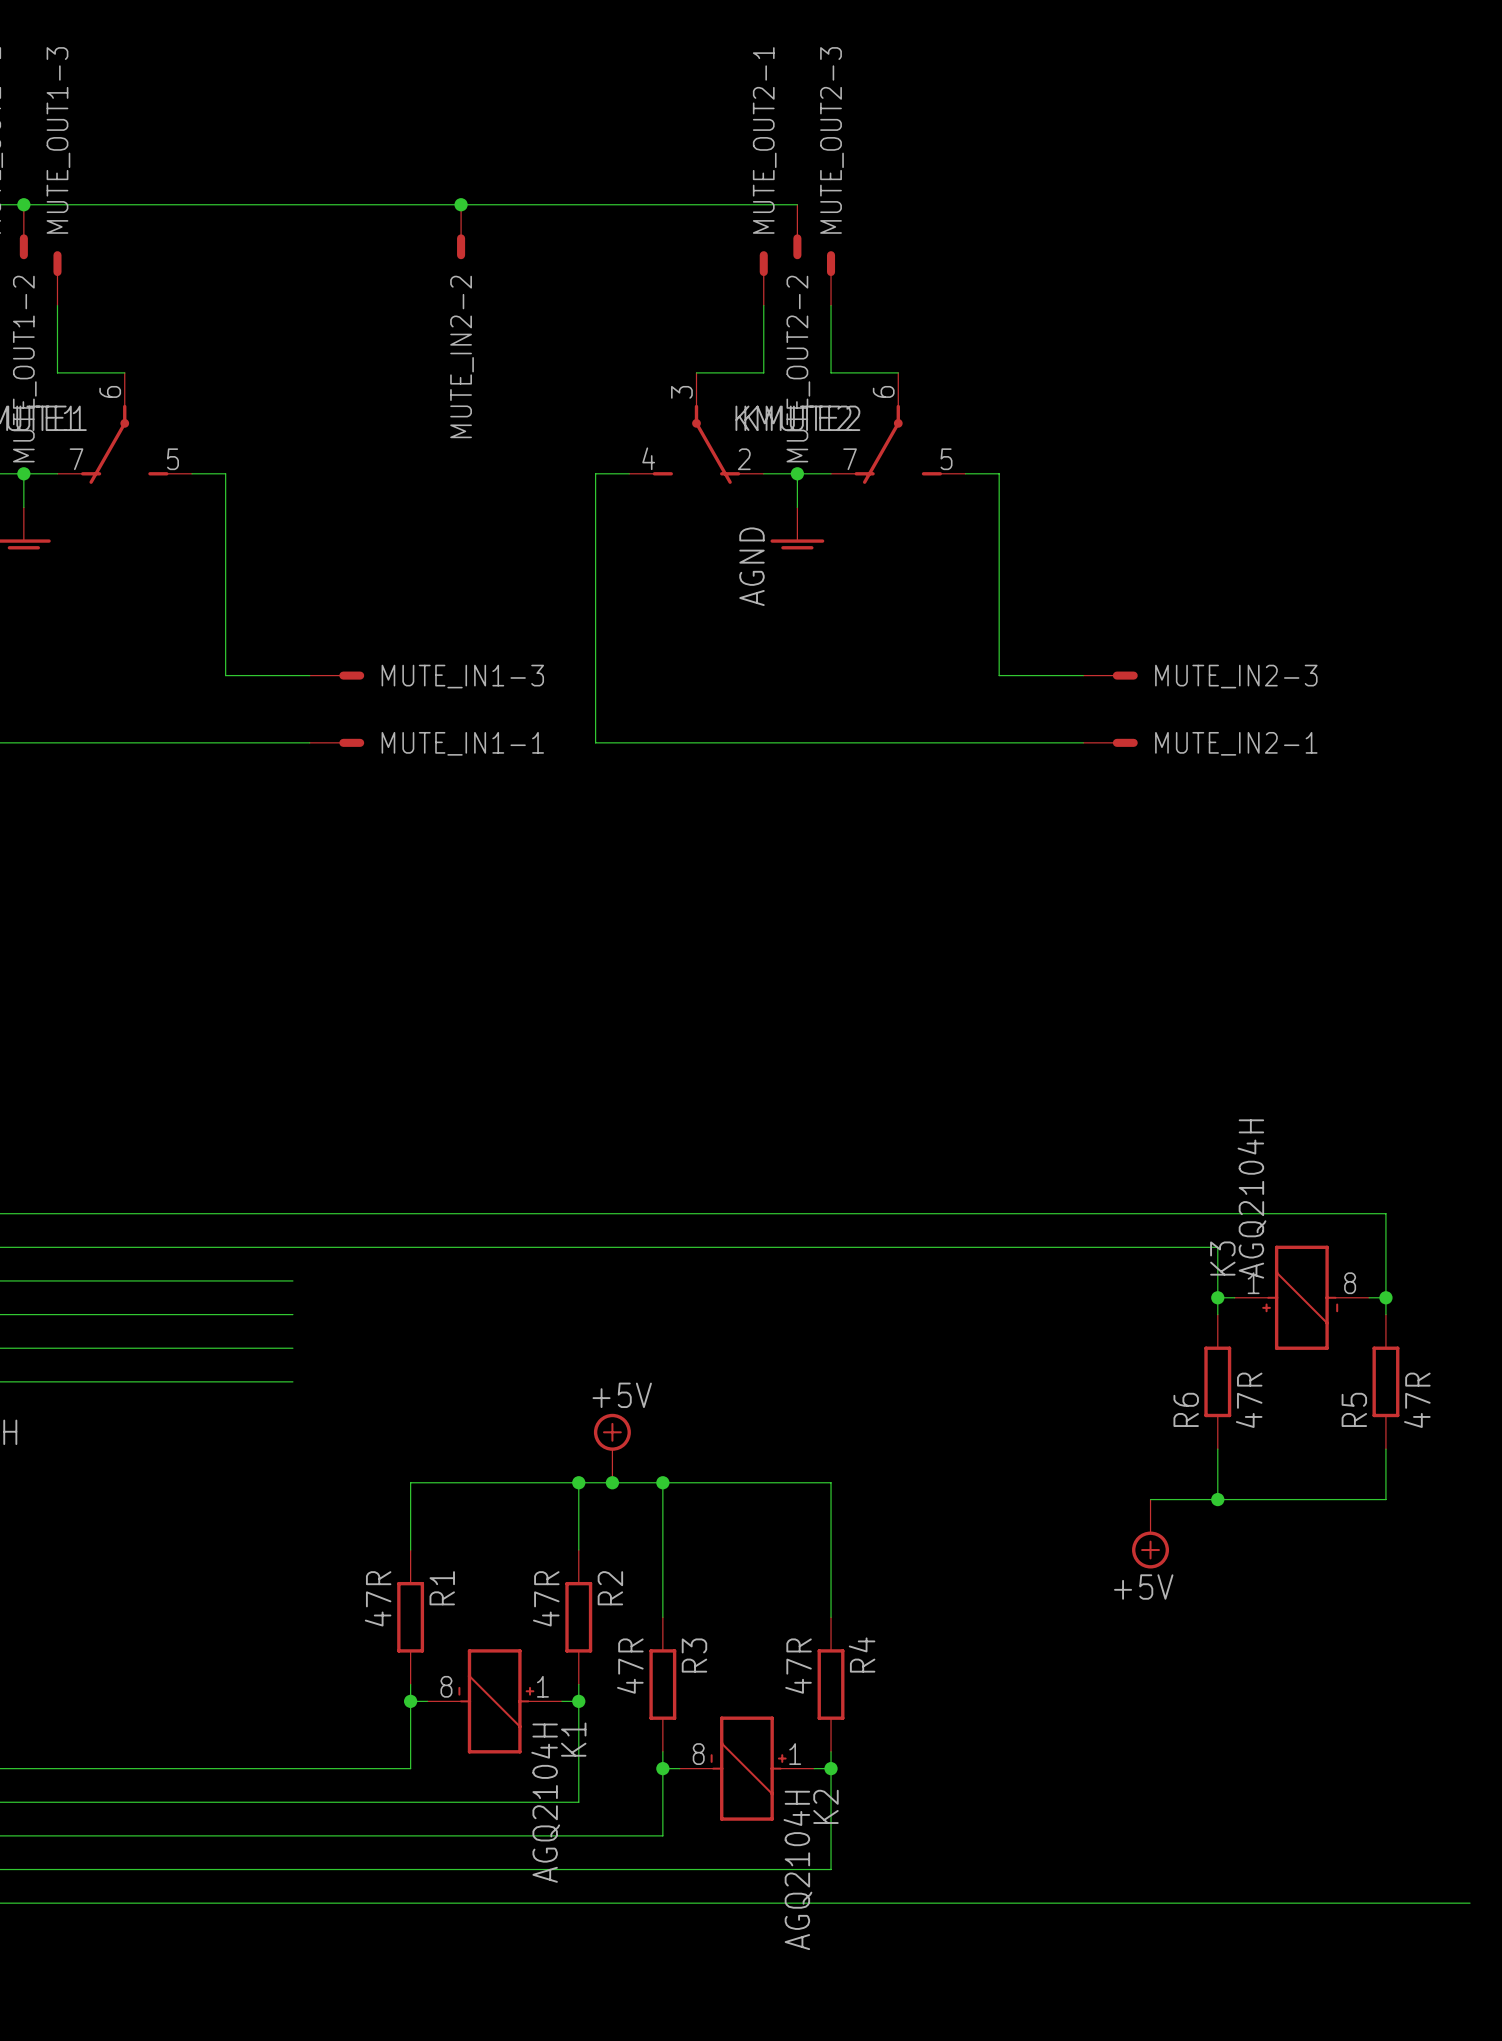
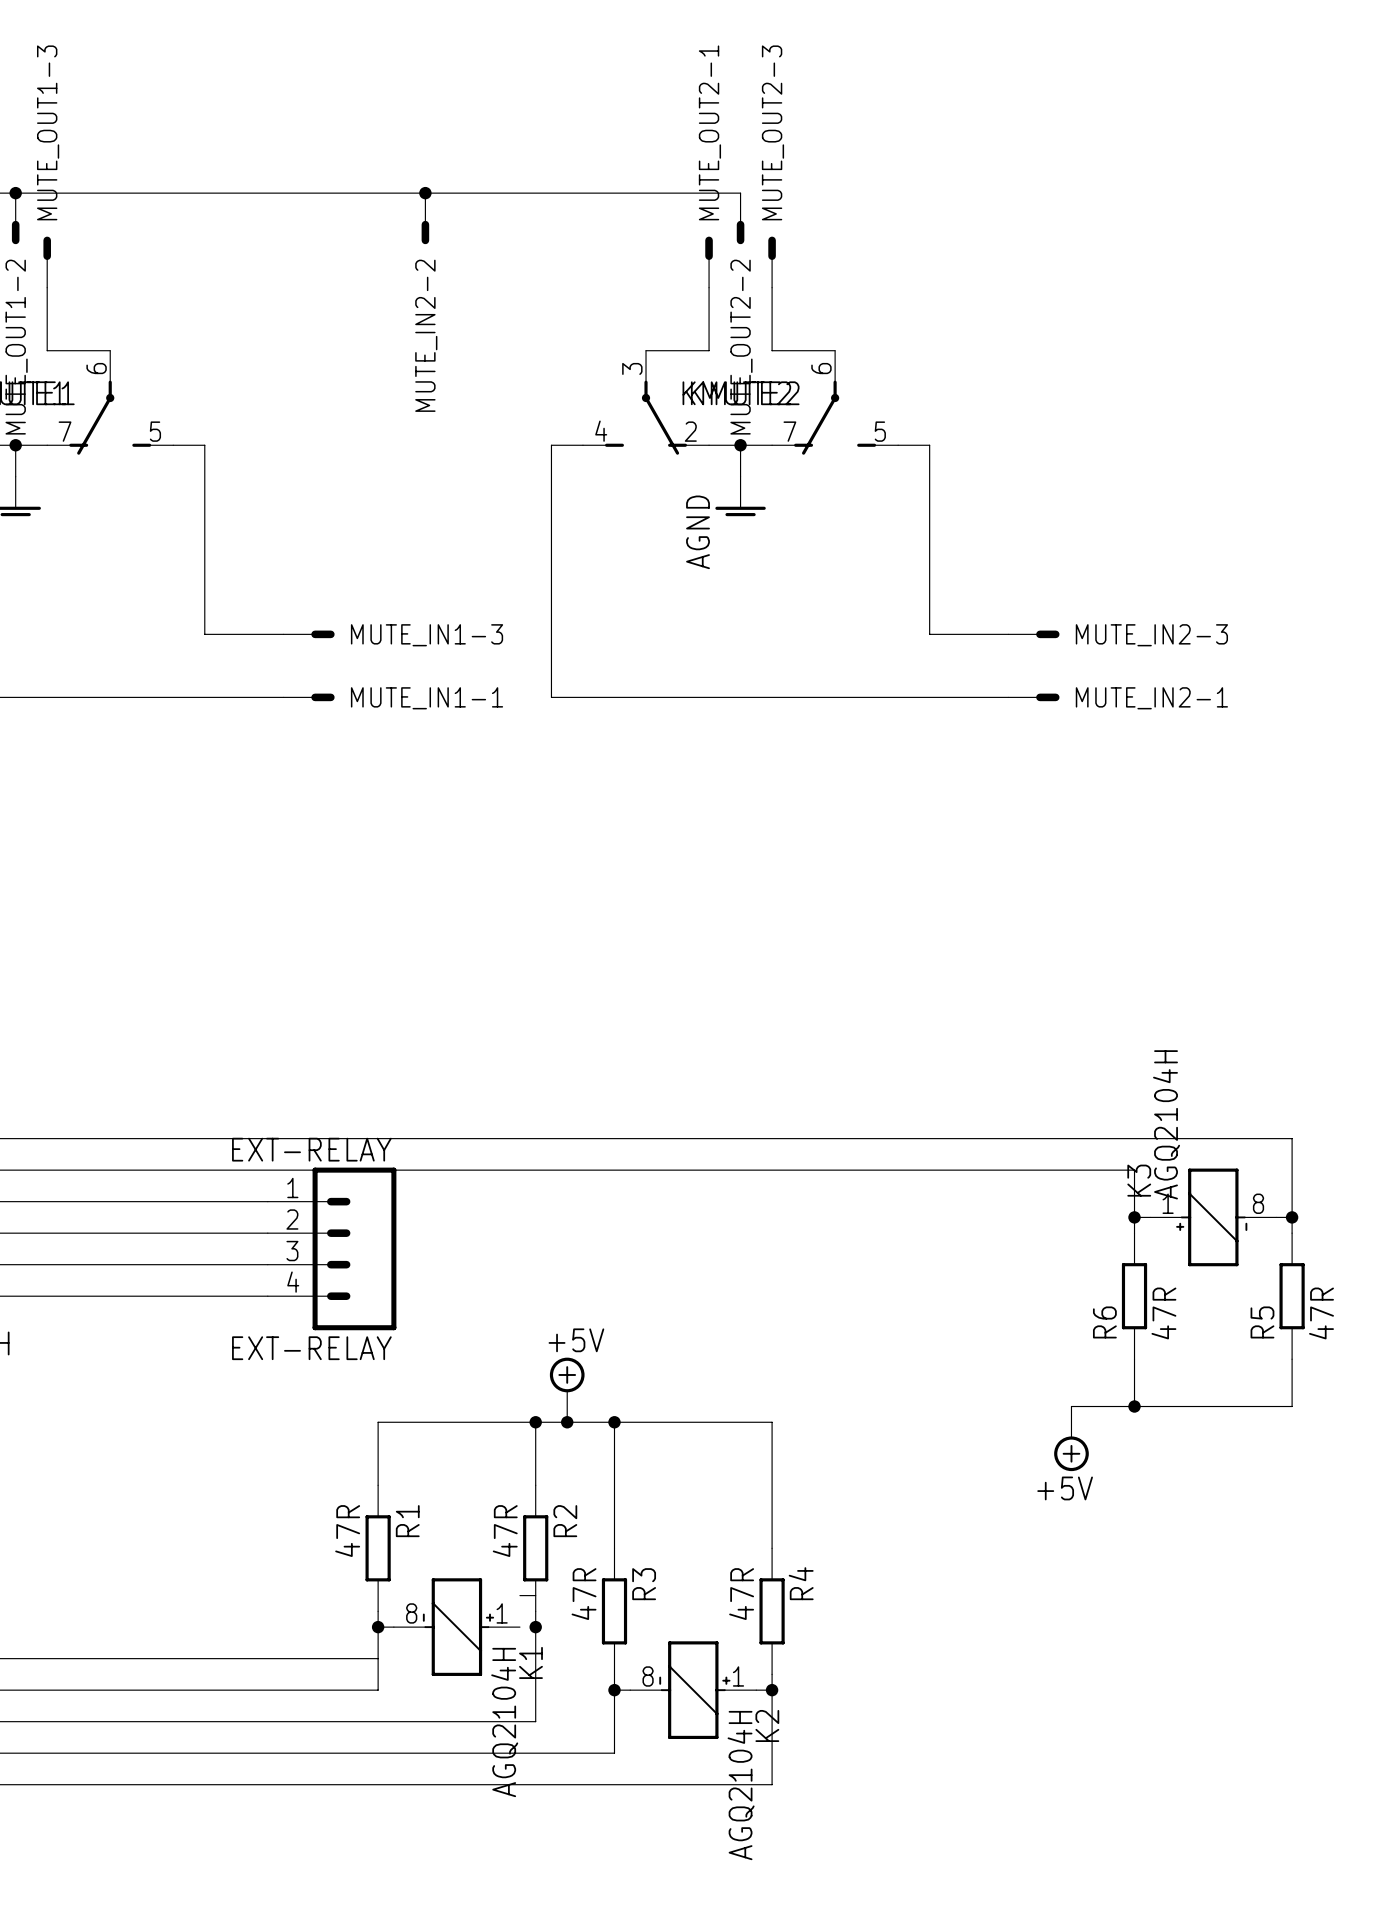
EXT-RELAY: none -> EXT-RELAY (332, 1248)
power symbol position: +5V (612, 1448) -> +5V (567, 1389)
wire: (578, 1482) (578, 1516) -> none
junction: (578, 1482) -> none
junction: (612, 1482) -> none
wire: (662, 1482) (662, 1516) -> none
junction: (662, 1482) -> none
wire: (410, 1516) (410, 1482) (831, 1482) (831, 1516) -> (378, 1422) (772, 1422)
junction: none -> (535, 1422)
junction: none -> (567, 1422)
junction: none -> (614, 1422)
R1 position: (410, 1617) -> (378, 1548)
R2 position: (578, 1617) -> (535, 1548)
R3 position: (662, 1684) -> (614, 1611)
R4 position: (831, 1684) -> (772, 1611)
wire: (410, 1701) (427, 1701) -> (378, 1627) (393, 1627)
junction position: (410, 1701) -> (378, 1627)
K1 position: (494, 1701) -> (456, 1627)
junction position: (578, 1701) -> (535, 1627)
wire: (662, 1768) (679, 1768) -> (614, 1690) (630, 1690)
junction position: (662, 1768) -> (614, 1690)
K2 position: (746, 1768) -> (693, 1690)
wire: (814, 1768) (831, 1768) -> (756, 1690) (772, 1690)
junction position: (831, 1768) -> (772, 1690)
wire: (410, 1802) (578, 1802) -> (378, 1690) (378, 1658)
wire: (578, 1835) (662, 1835) -> (535, 1721) (535, 1690)
wire: (662, 1869) (831, 1869) -> (614, 1753) (614, 1721)
wire: (831, 1903) (1470, 1903) -> (772, 1784) (772, 1753)

